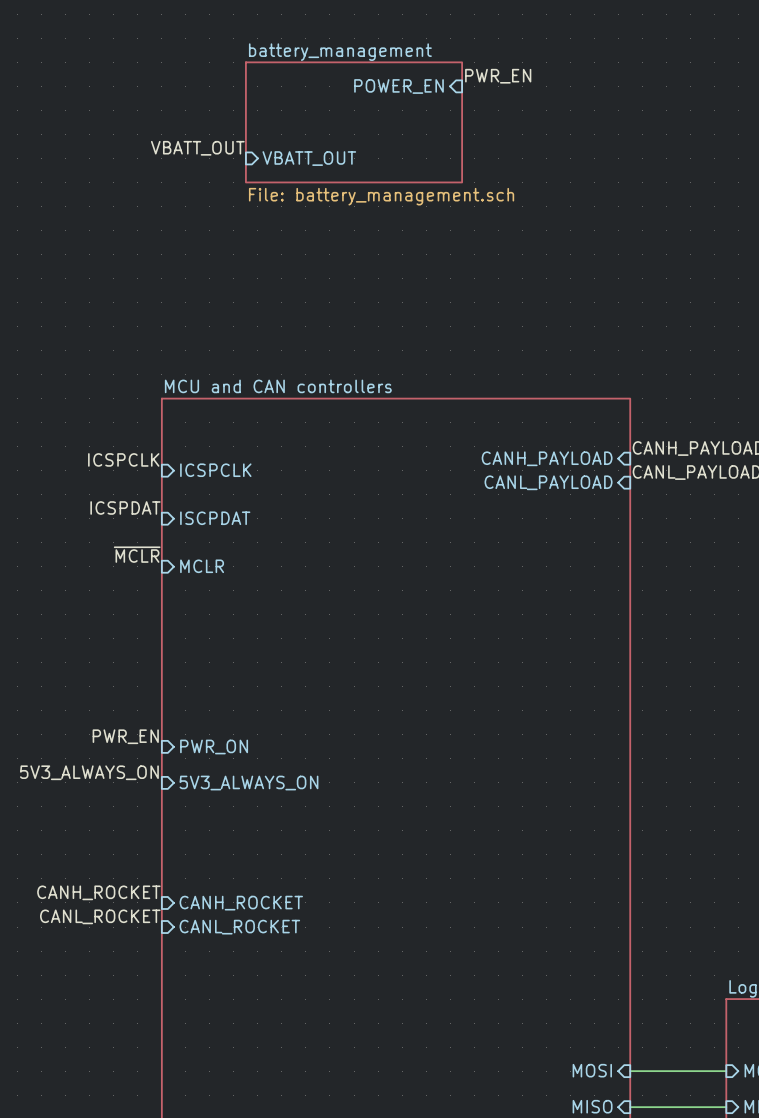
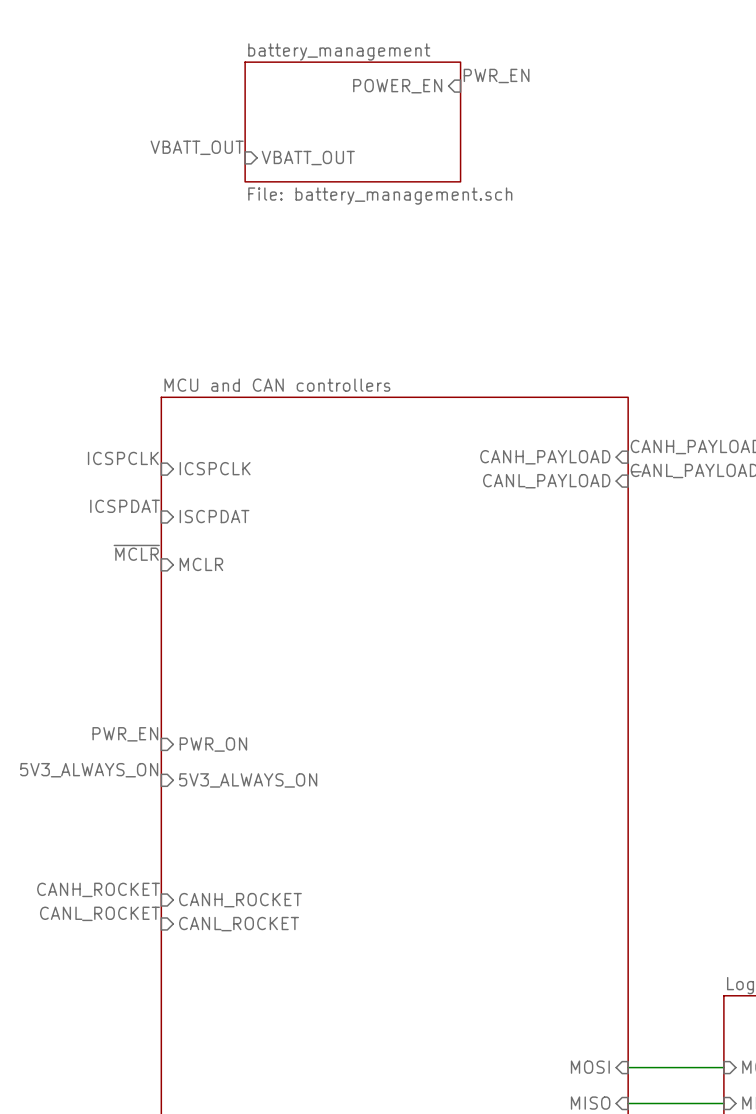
label: none -> - (636, 471)

